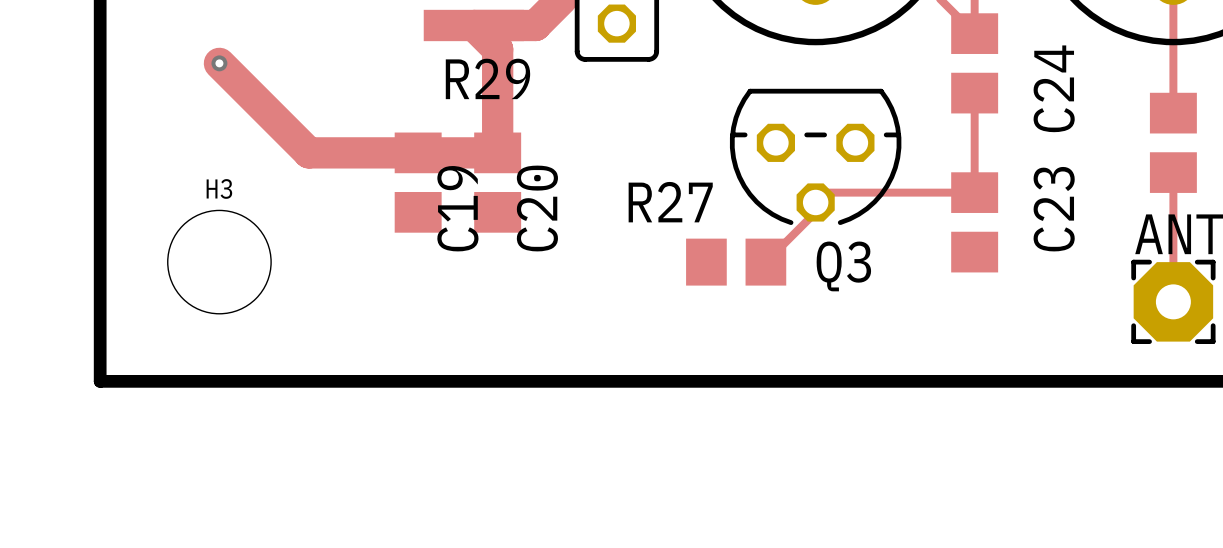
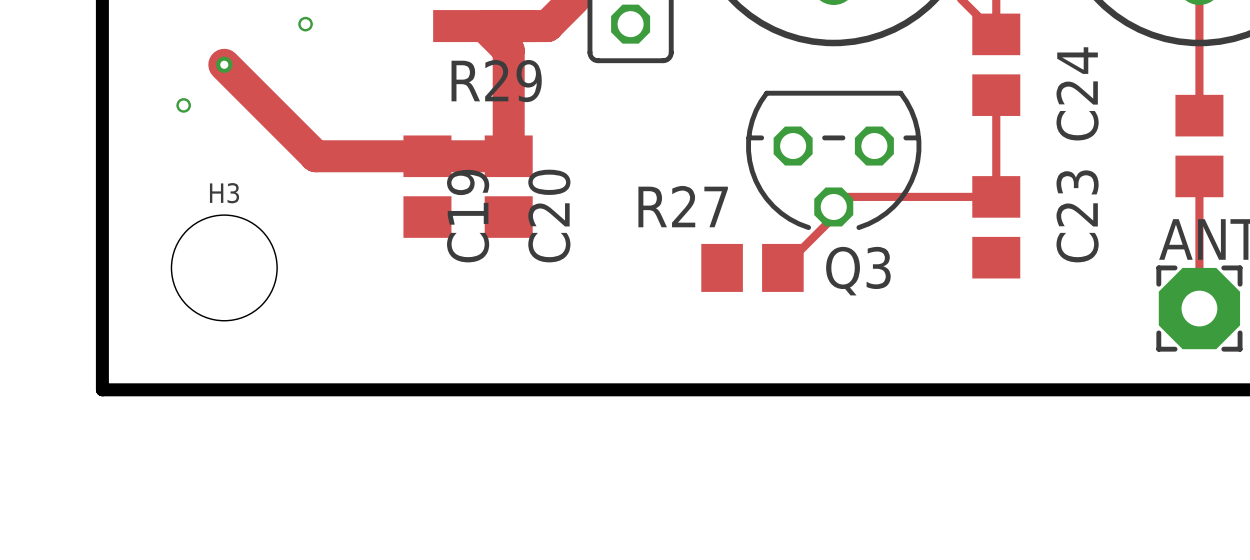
via: none -> (305, 24)
via: none -> (183, 105)

